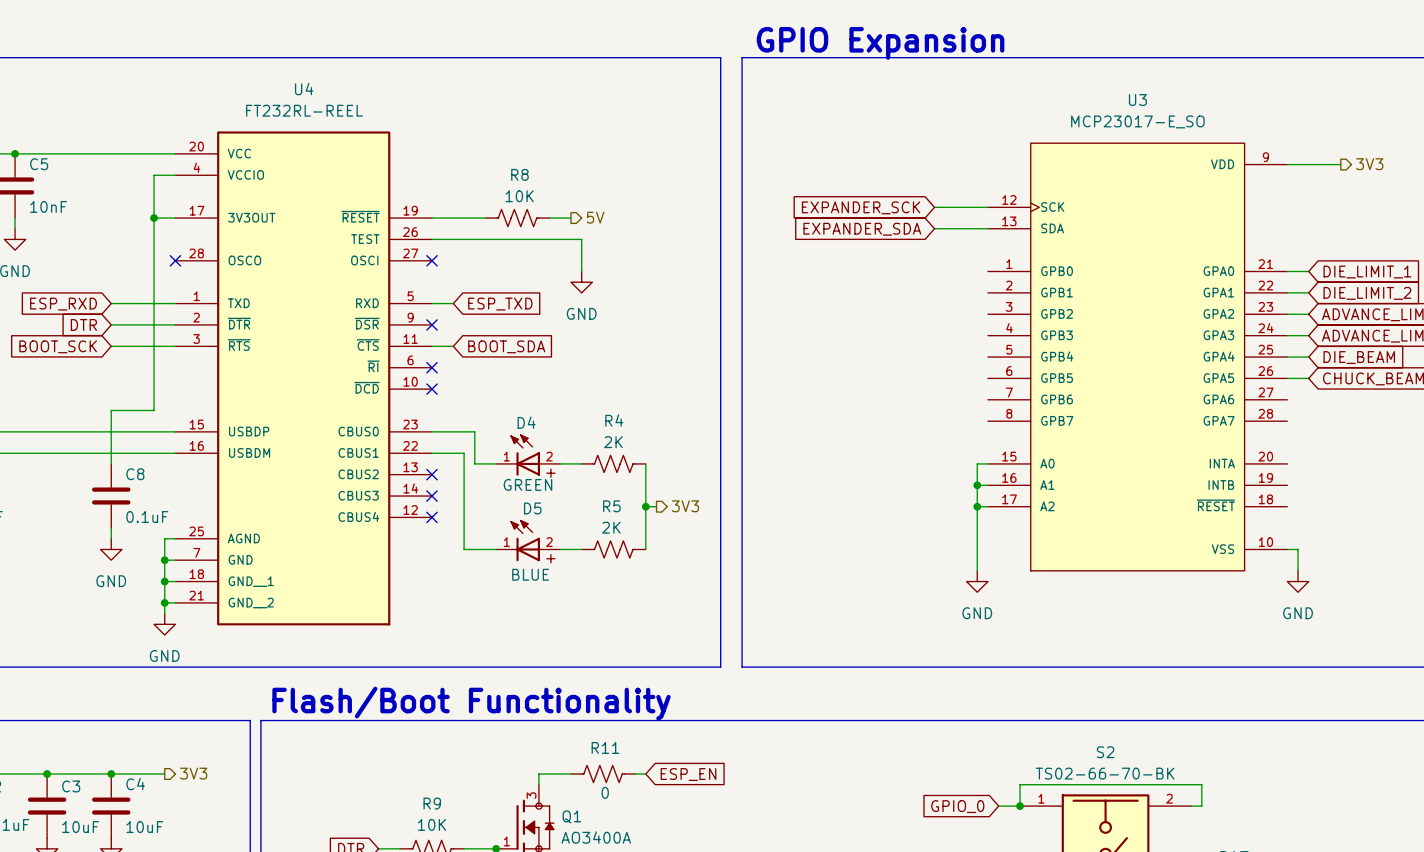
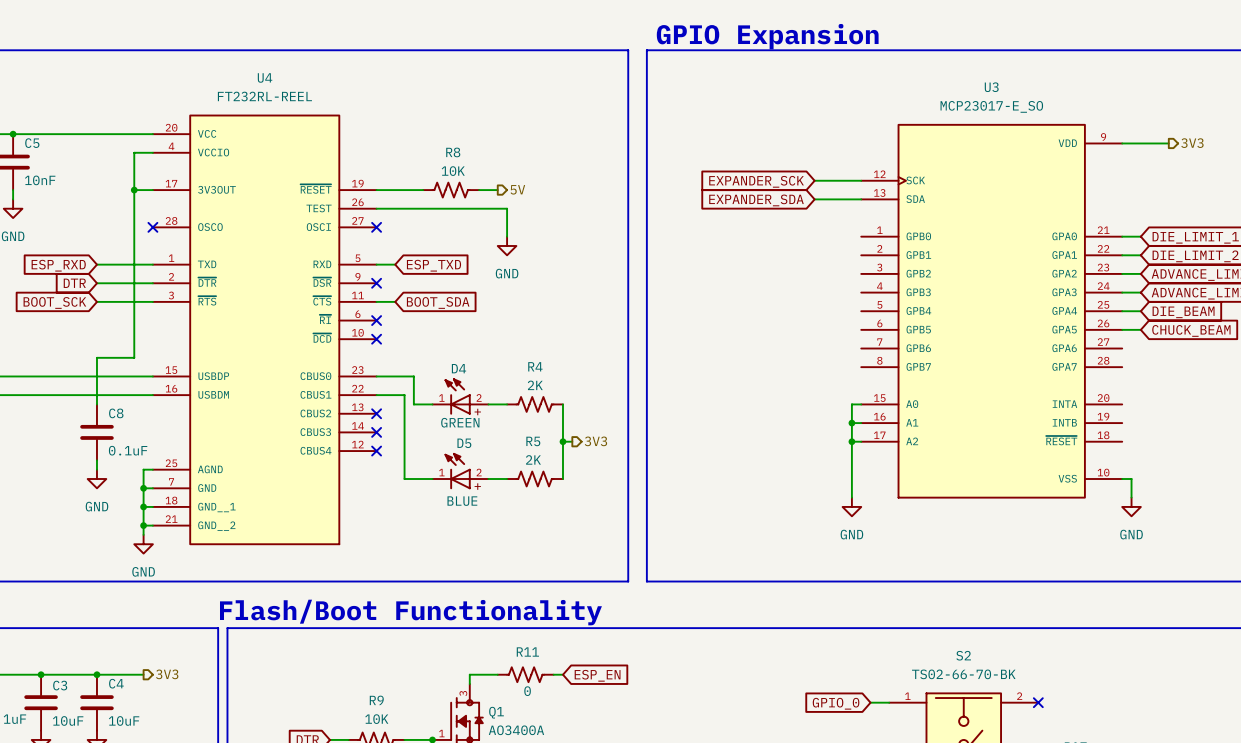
wire: (1020, 806) (1020, 784) (1201, 784) (1201, 806) (1191, 806) -> none
junction: (1020, 806) -> none
no-connect mark: none -> (1038, 702)

